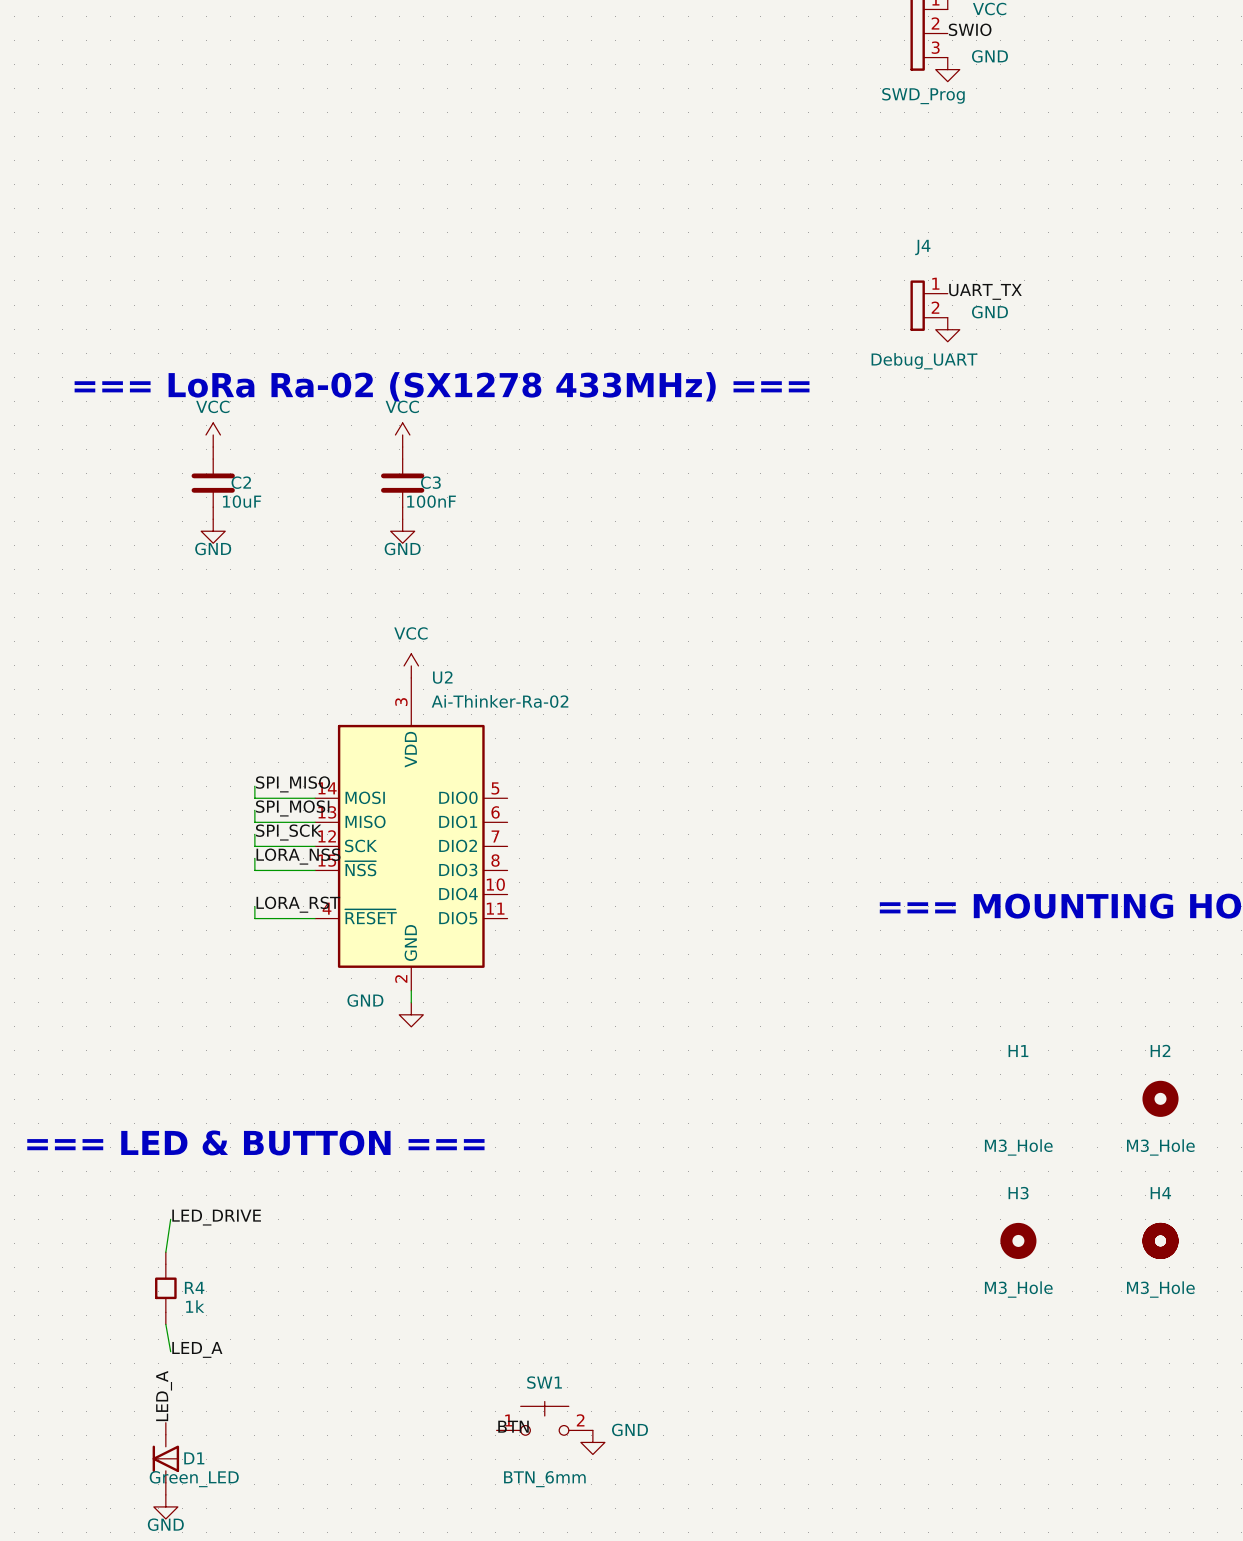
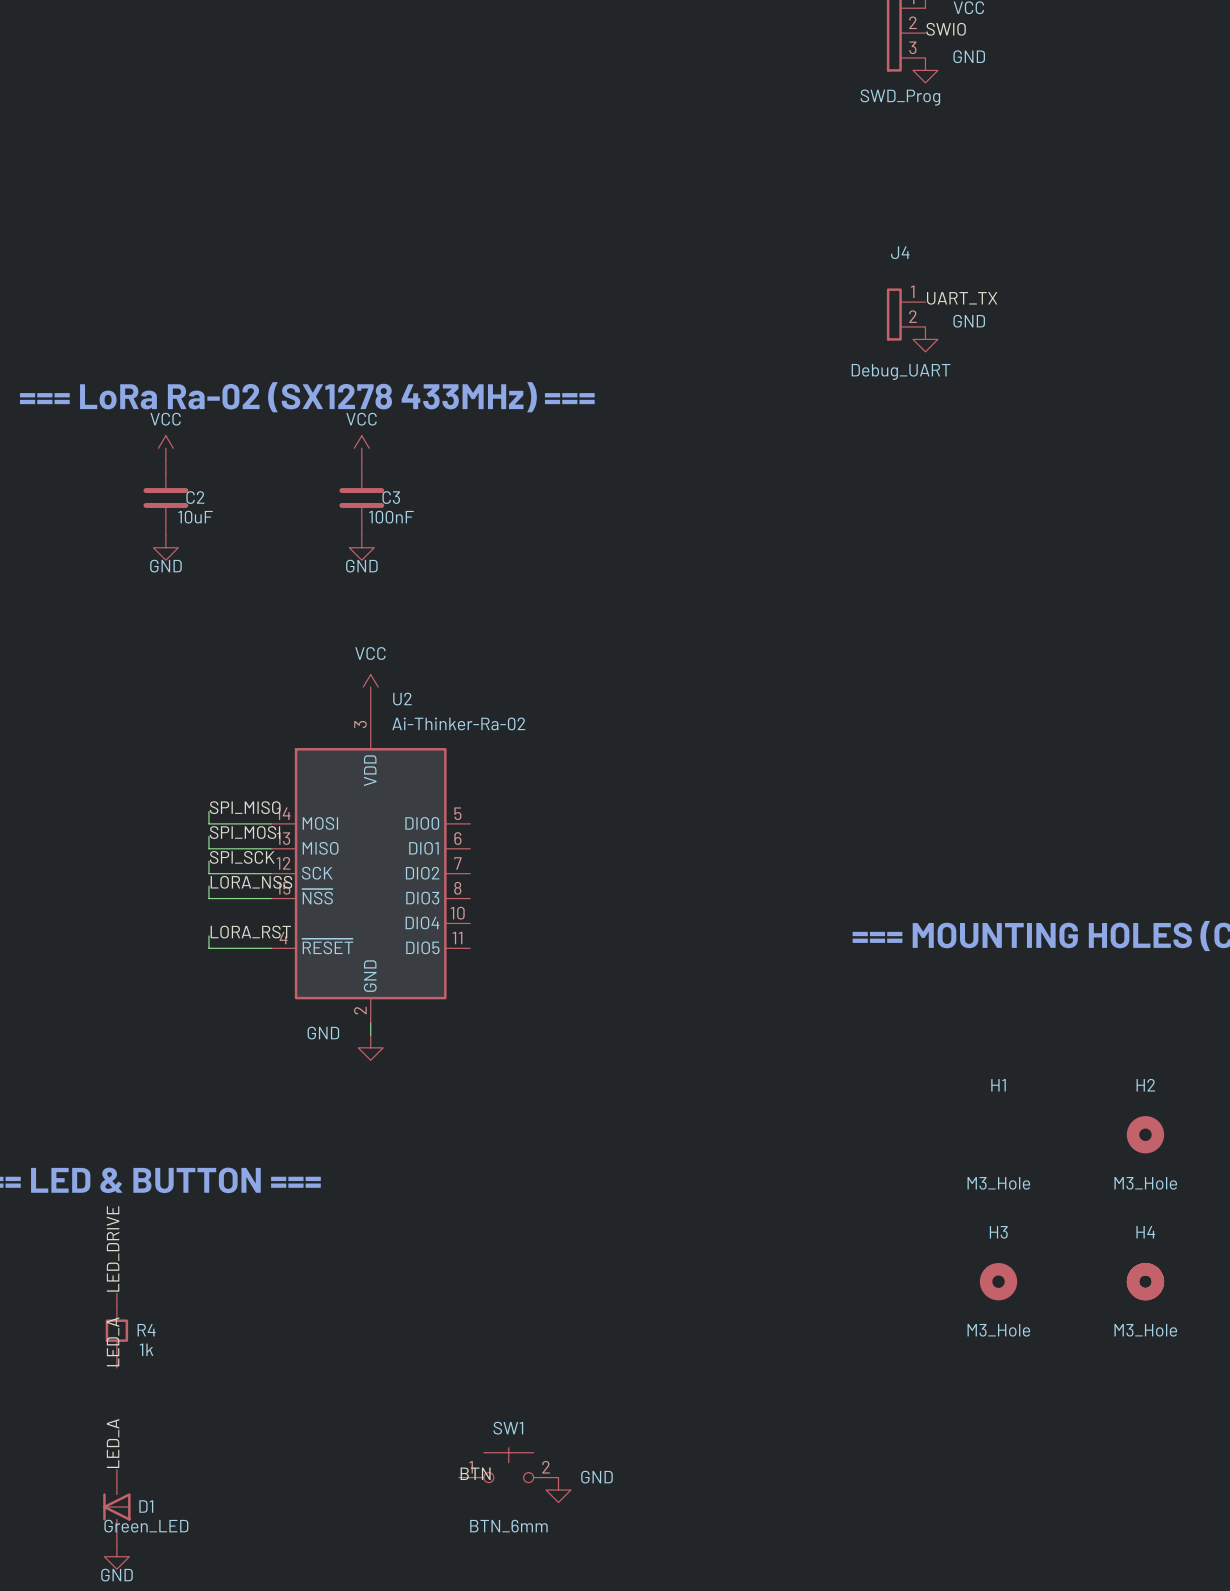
label rotation: 0° (216, 1217) -> 90° counterclockwise (113, 1248)
wire: (170, 1219) (165, 1252) -> none
wire: (165, 1324) (170, 1351) -> none
label rotation: 0° (197, 1349) -> 90° counterclockwise (113, 1341)
label position: LED_A (197, 1349) -> LED_A (113, 1341)

